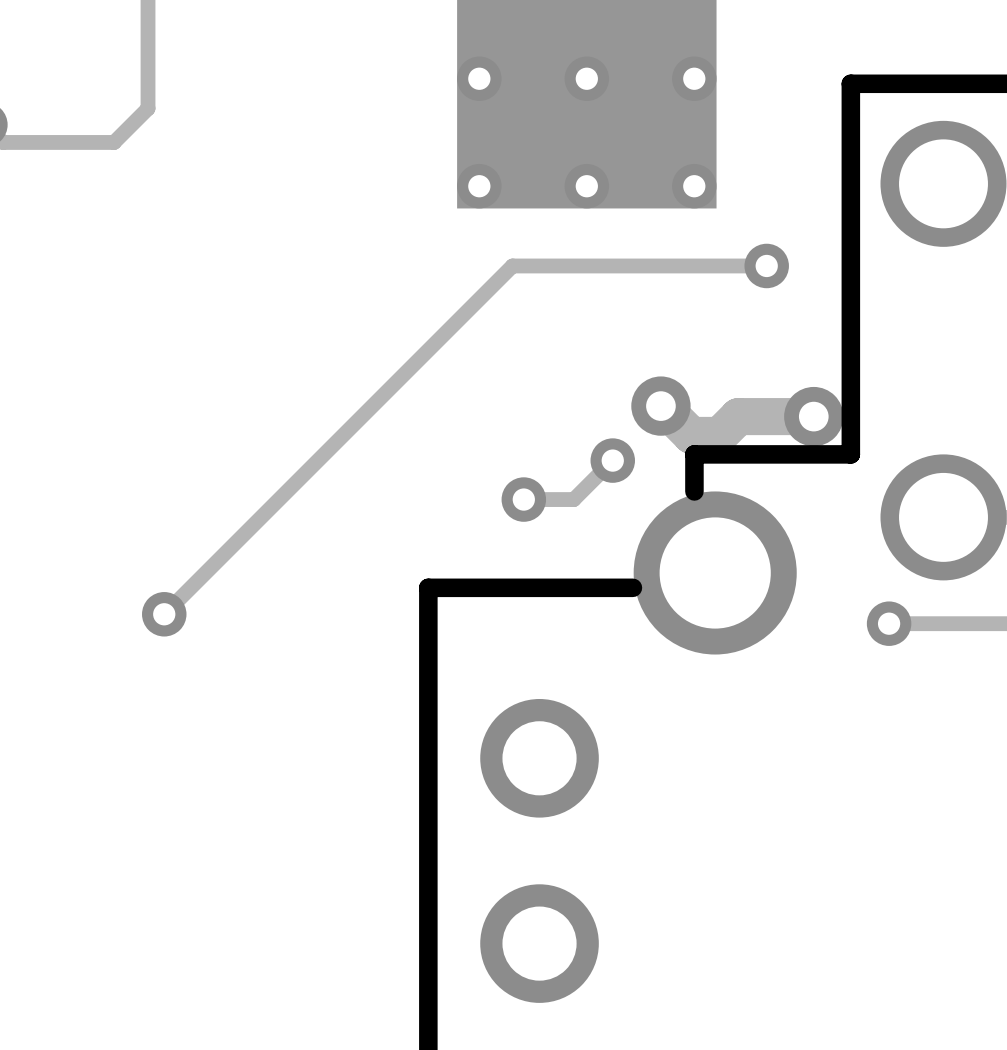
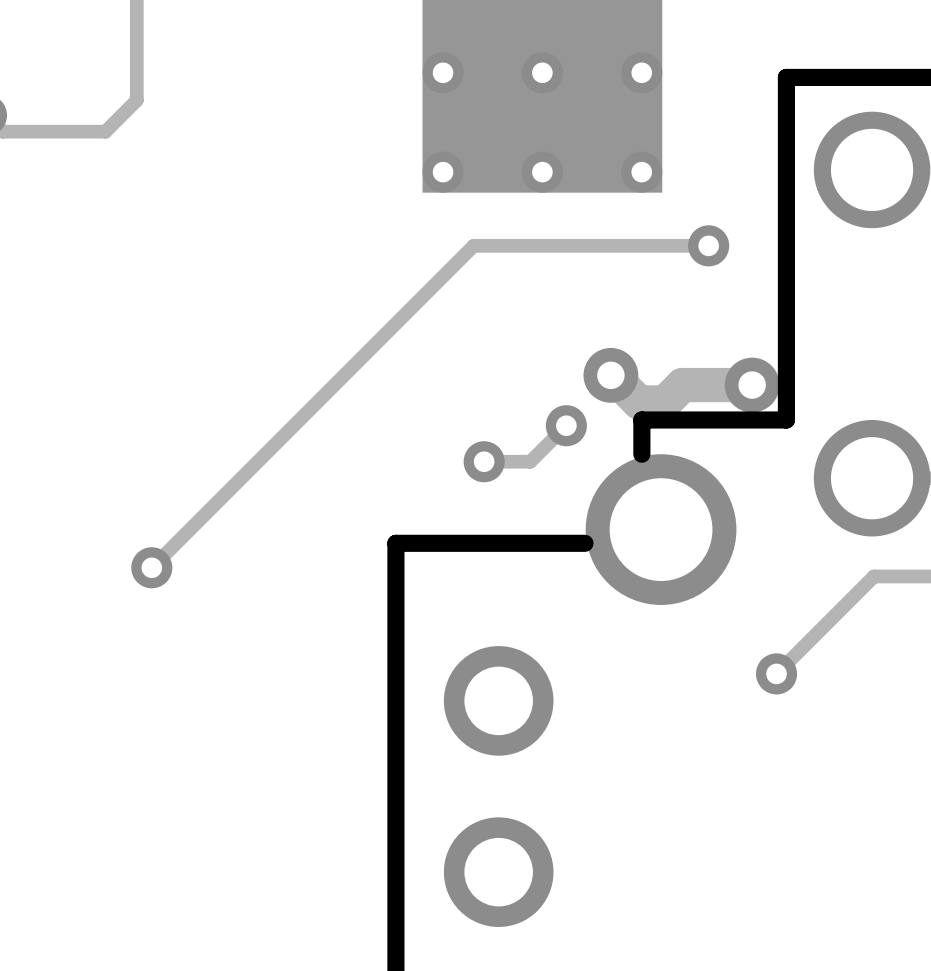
track: (889, 623) (945, 623) -> (776, 673) (873, 576)
via position: (889, 623) -> (776, 673)

